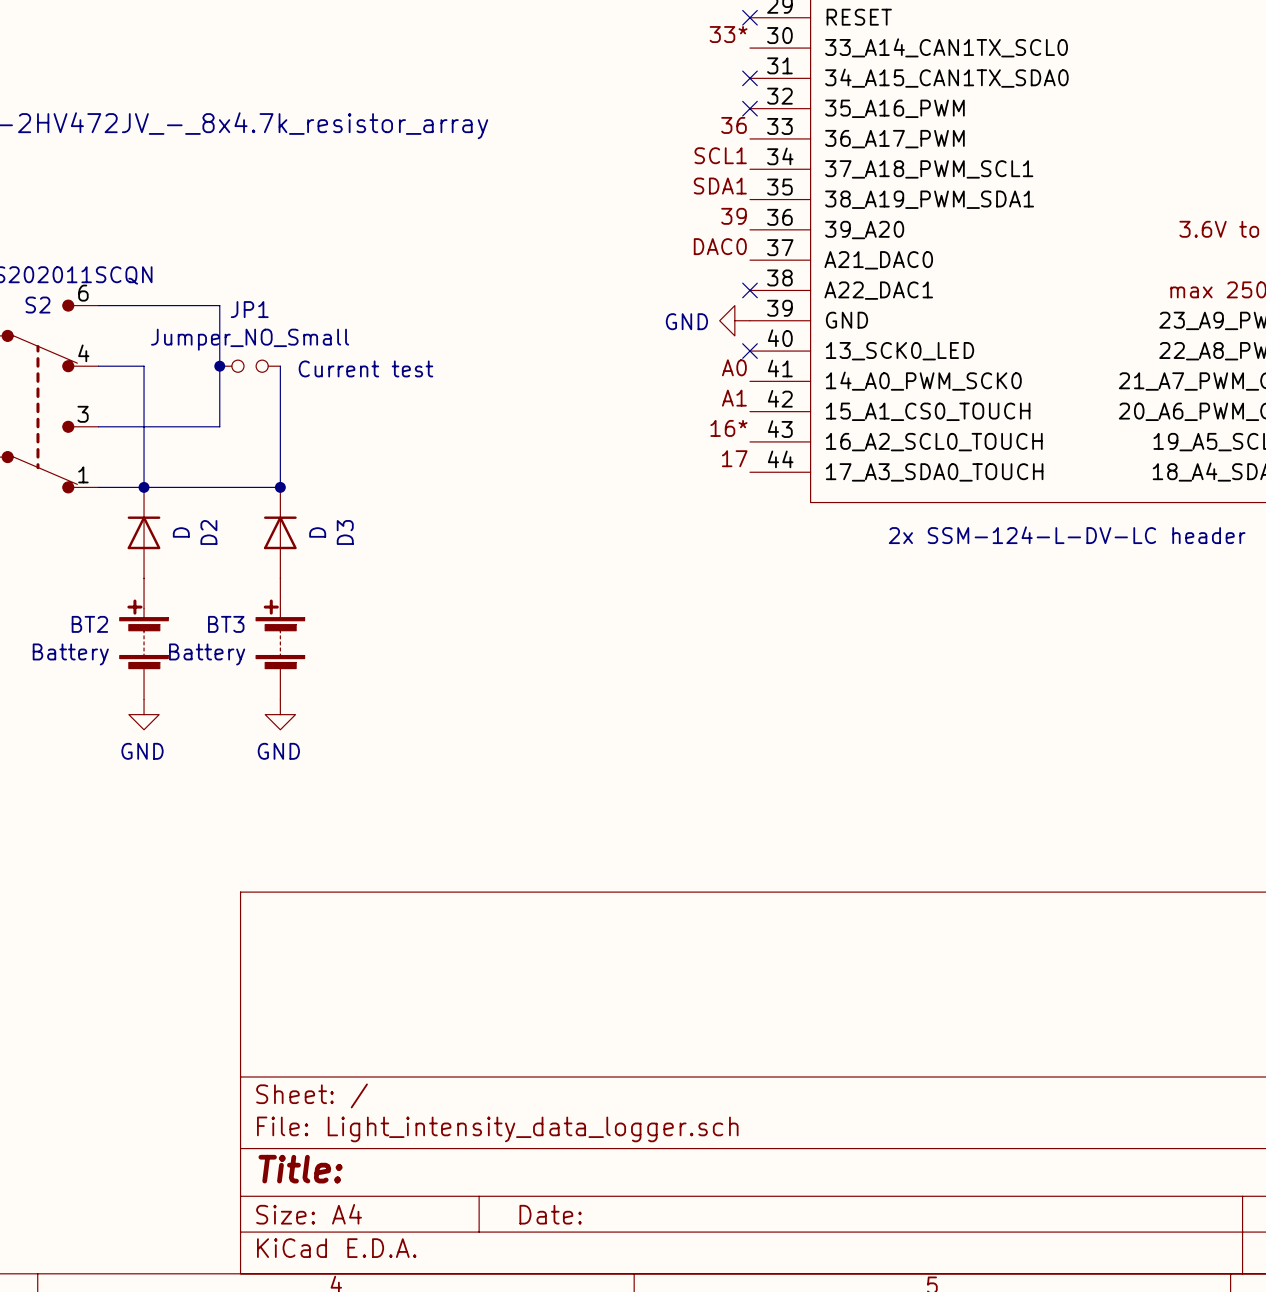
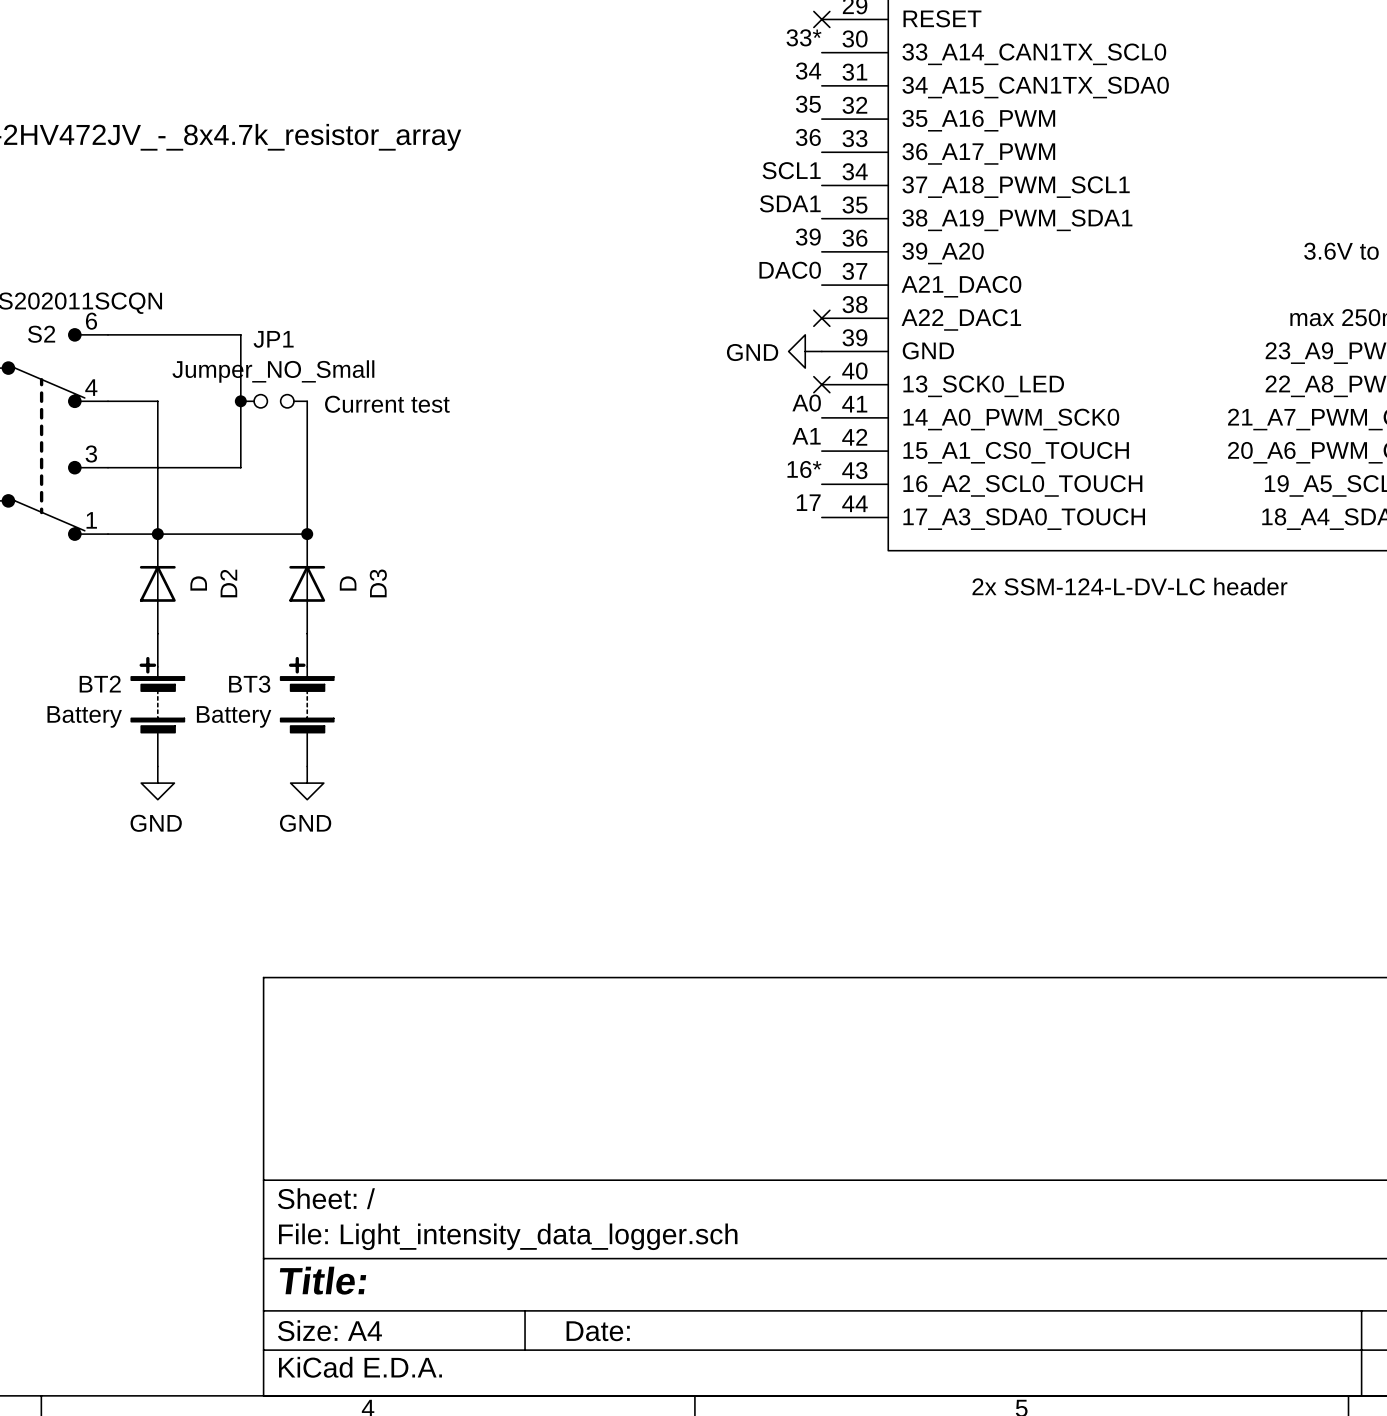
label: none -> 34 (808, 71)
no-connect mark: (749, 78) -> none
label: none -> 35 (808, 104)
no-connect mark: (749, 108) -> none

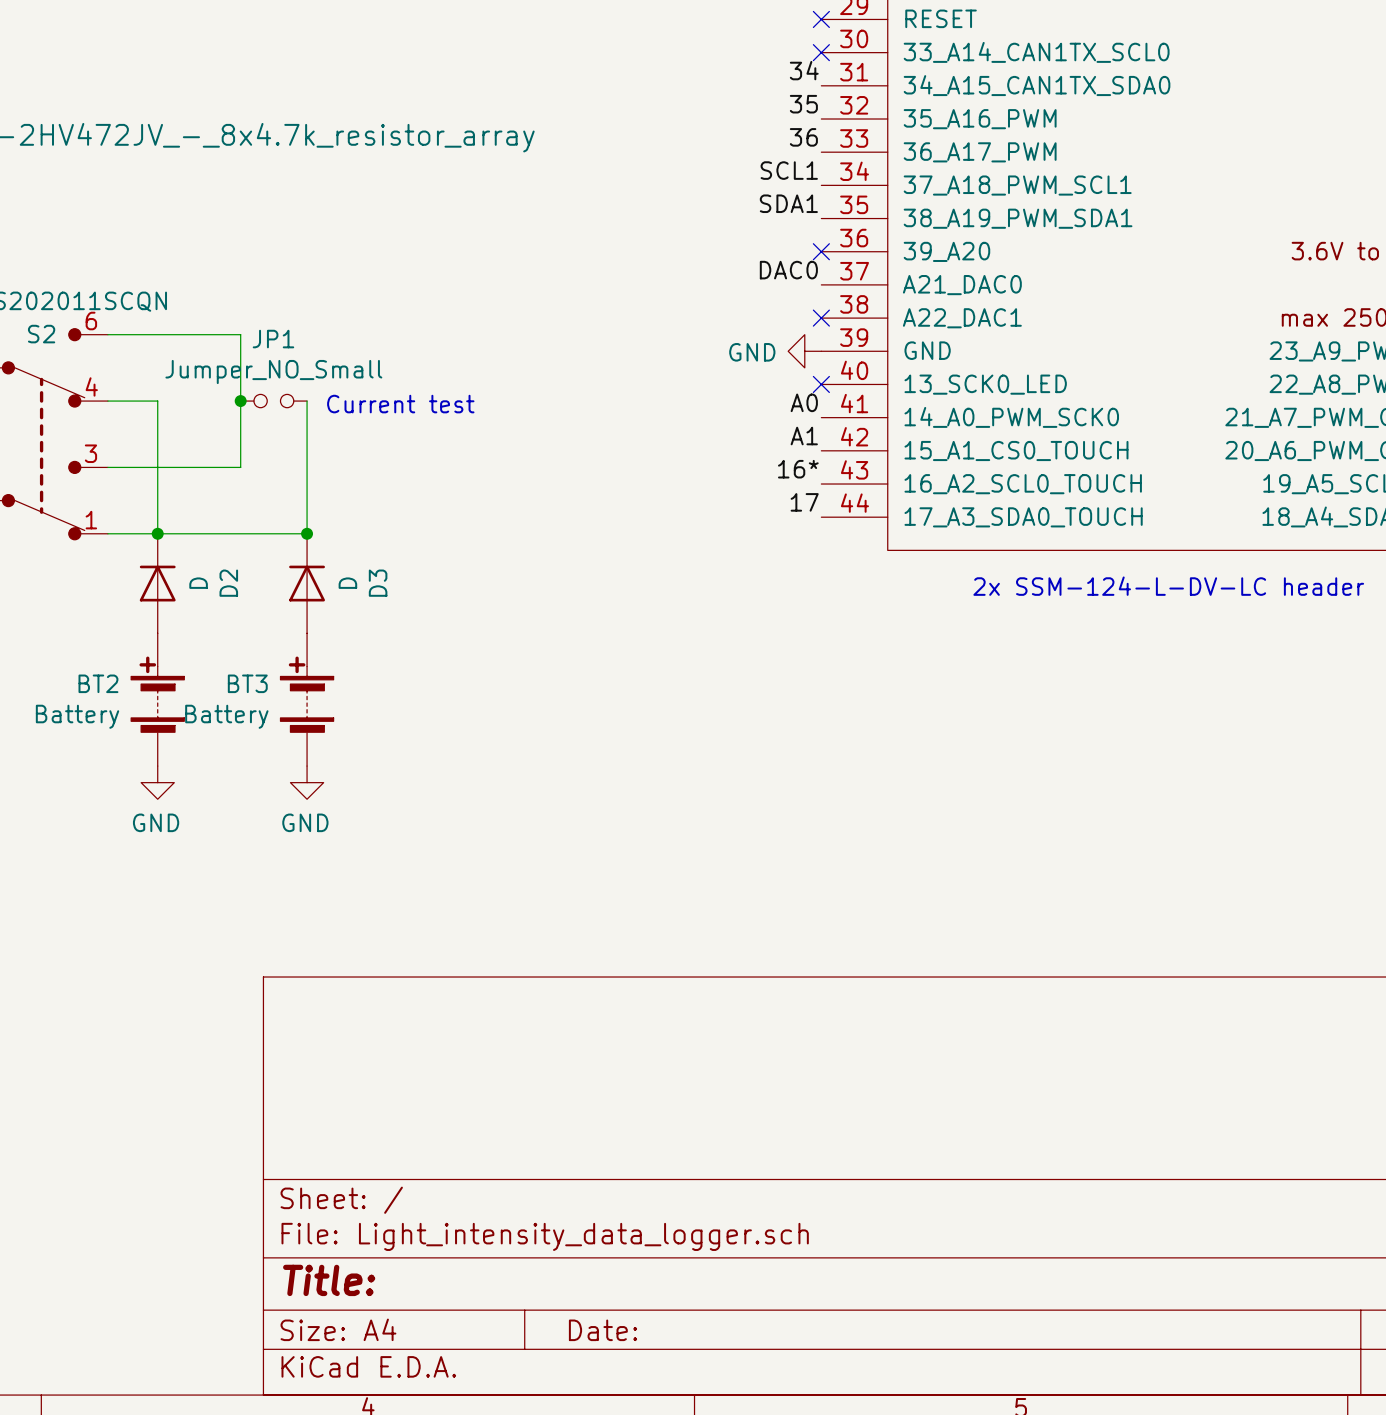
label: 33* (804, 37) -> none
no-connect mark: none -> (821, 52)
label: 39 (808, 237) -> none
no-connect mark: none -> (821, 251)

